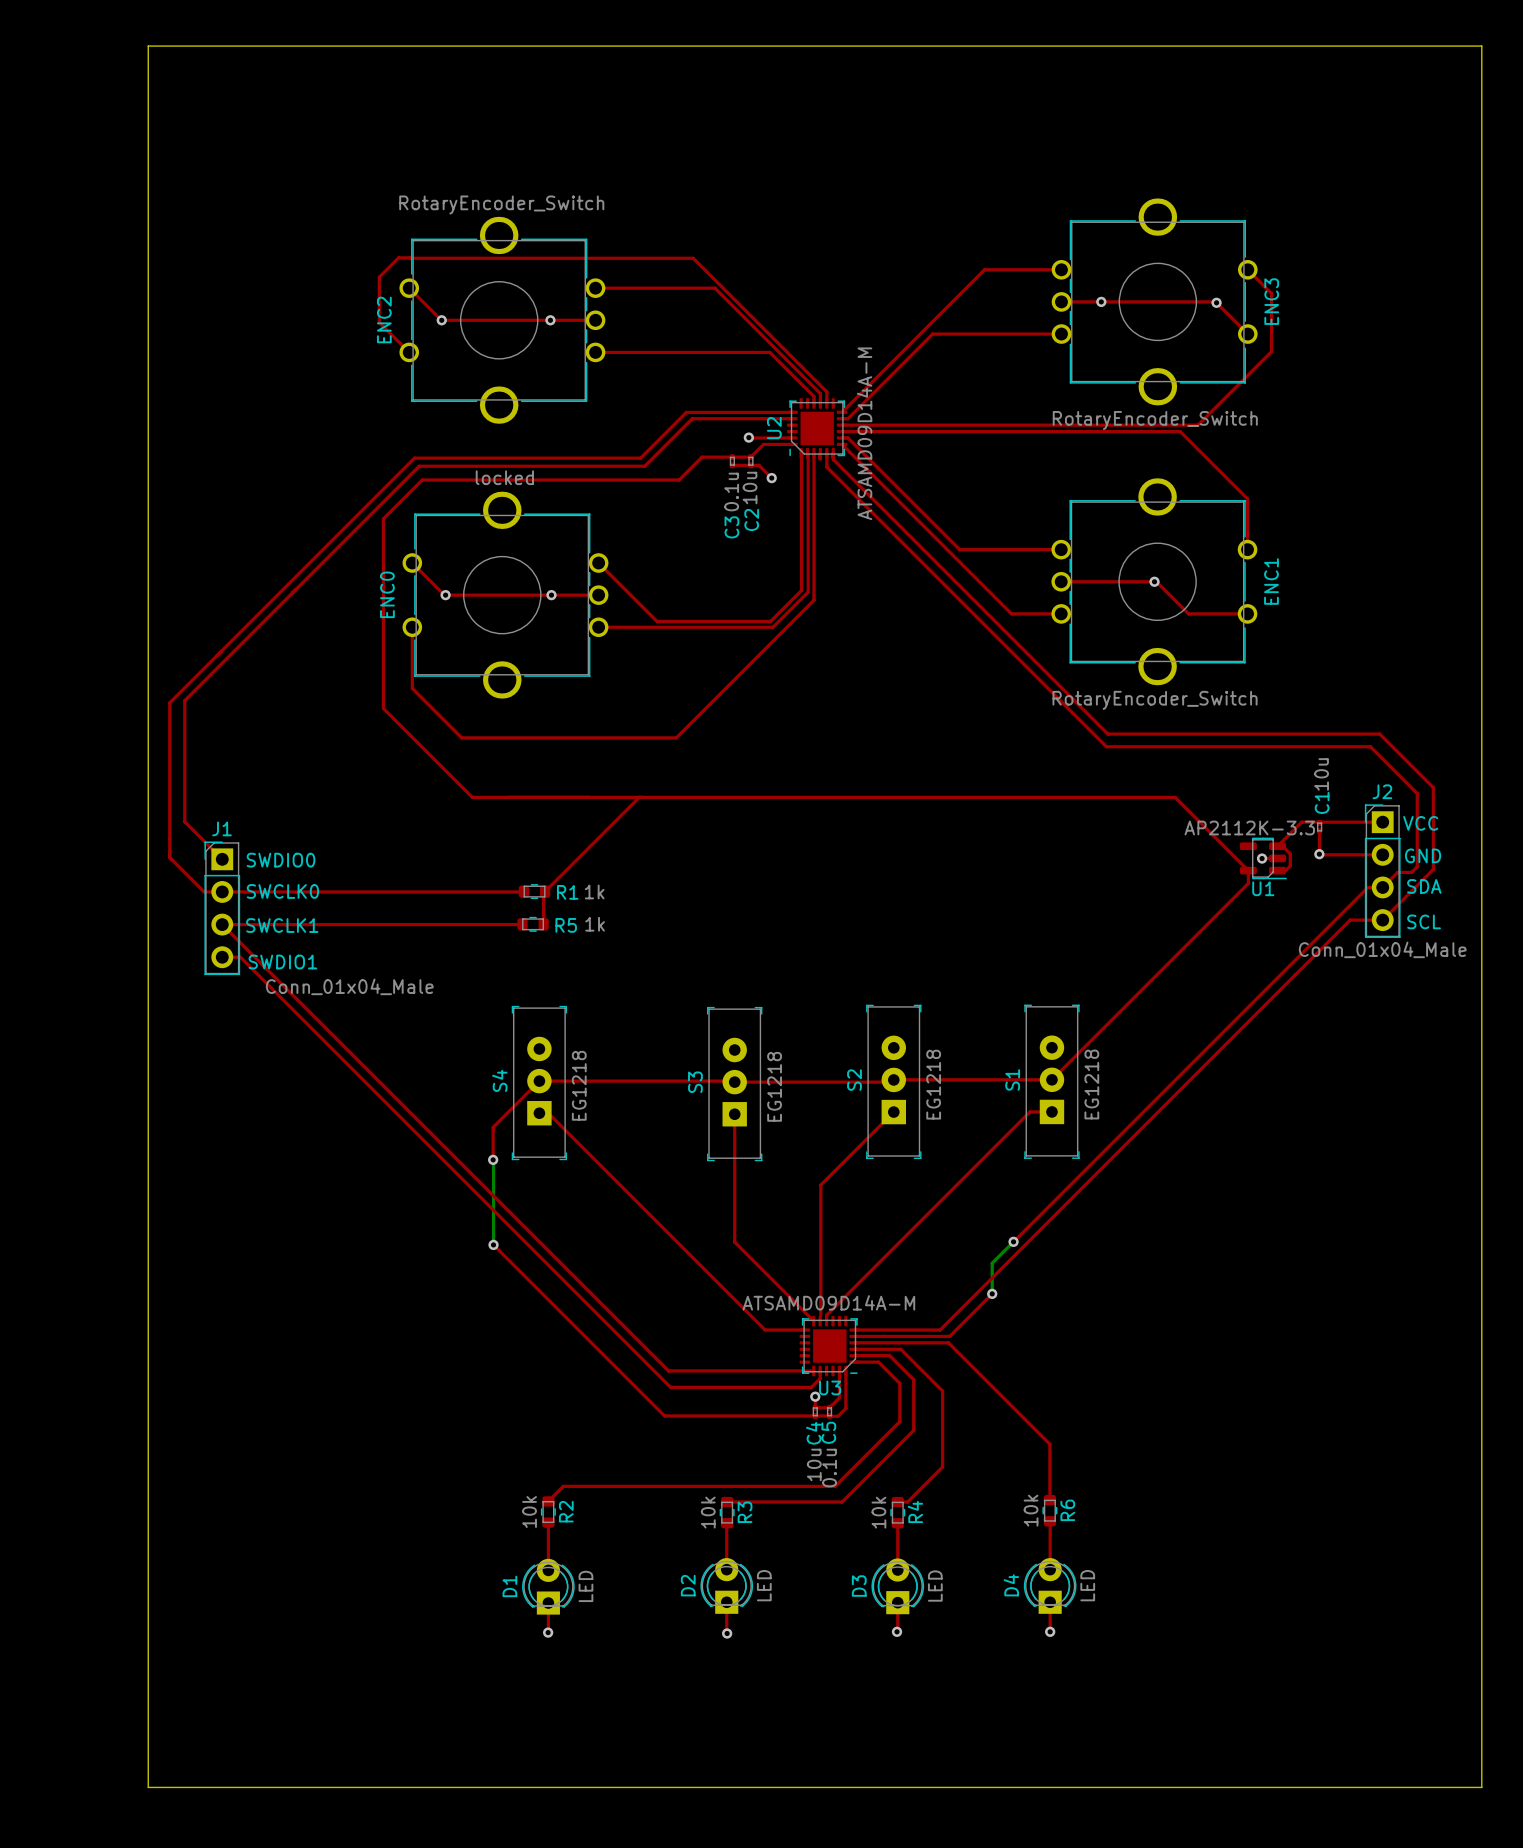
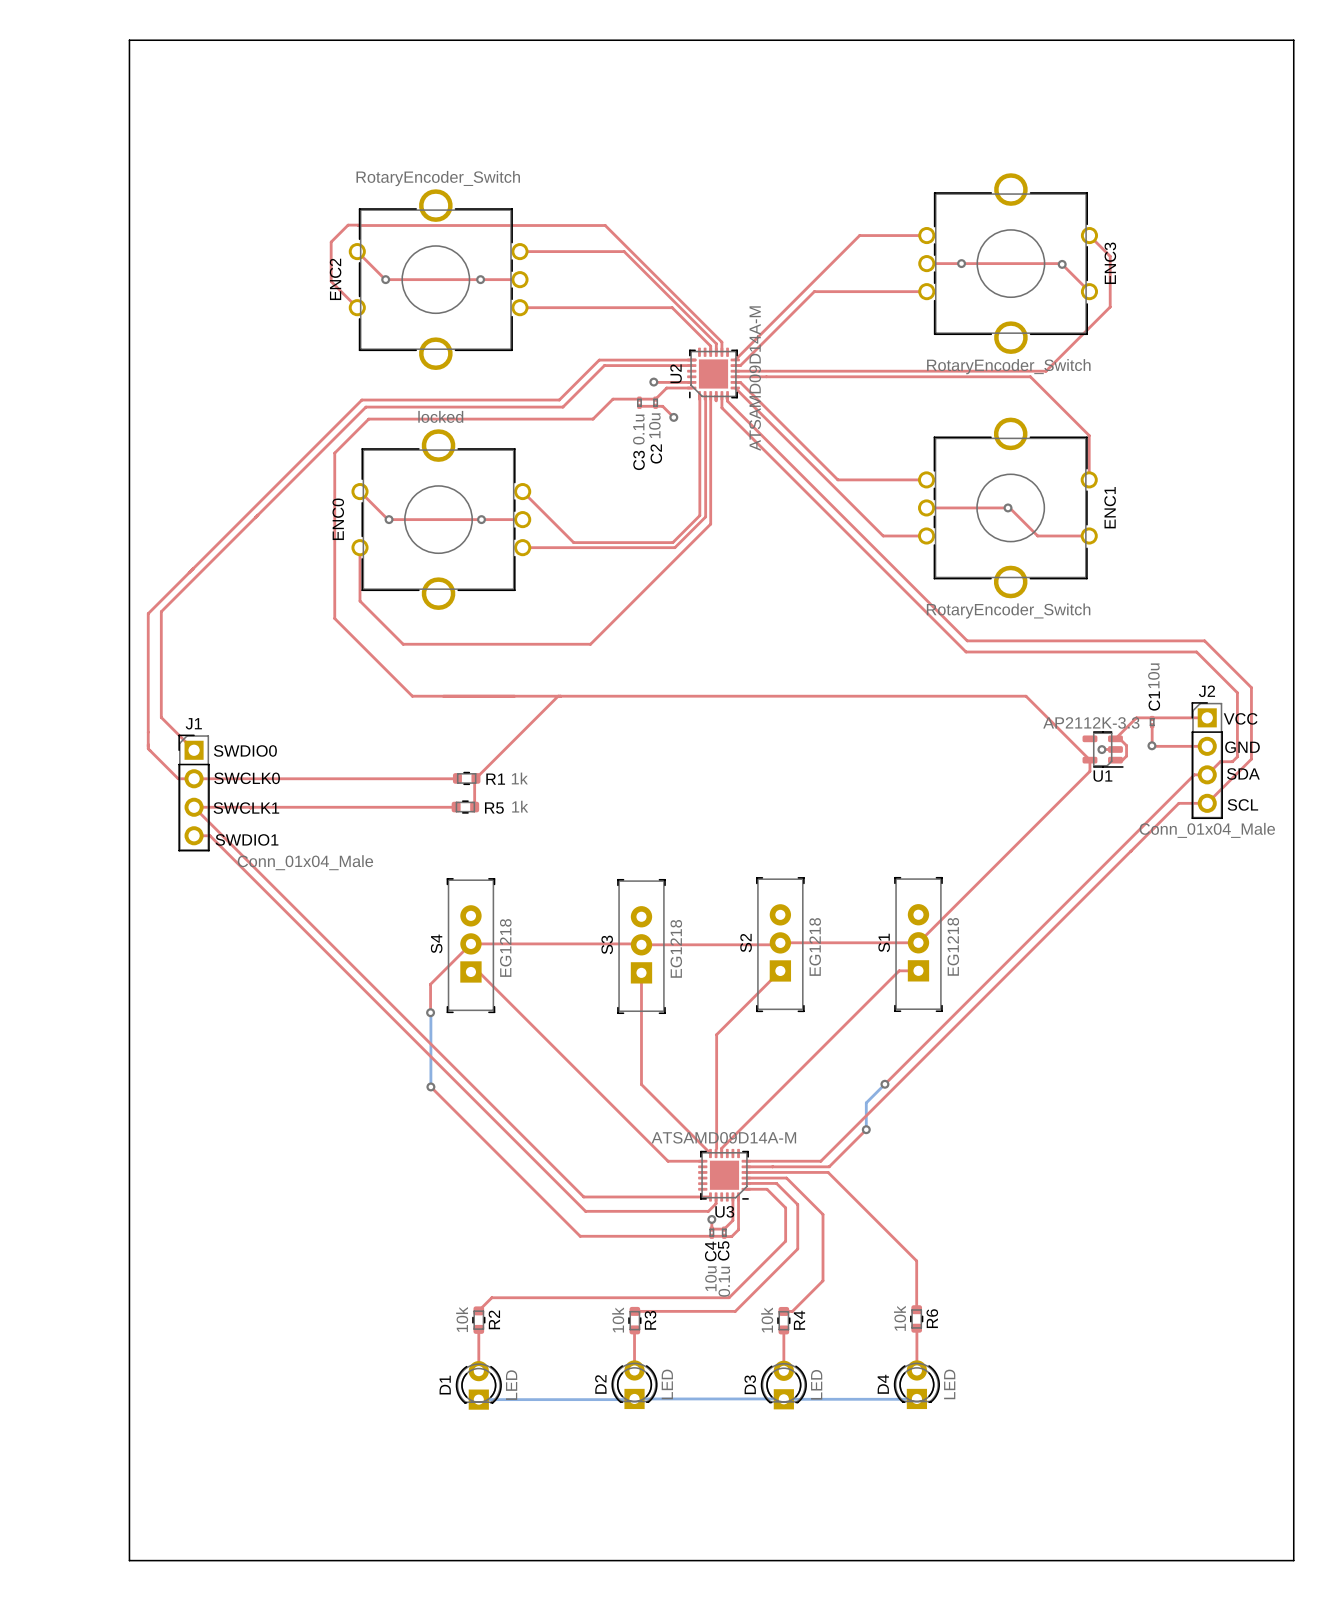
top track: (726, 1602) (727, 1633) -> none
bottom track: none -> (634, 1398) (783, 1398)
top track: (897, 1602) (897, 1631) -> none
bottom track: none -> (783, 1399) (916, 1399)
top track: (1050, 1602) (1050, 1631) -> none
top track: (548, 1603) (548, 1632) -> none
bottom track: none -> (478, 1399) (633, 1399)
via: (897, 1631) -> none
via: (1050, 1631) -> none
via: (548, 1632) -> none
via: (727, 1633) -> none

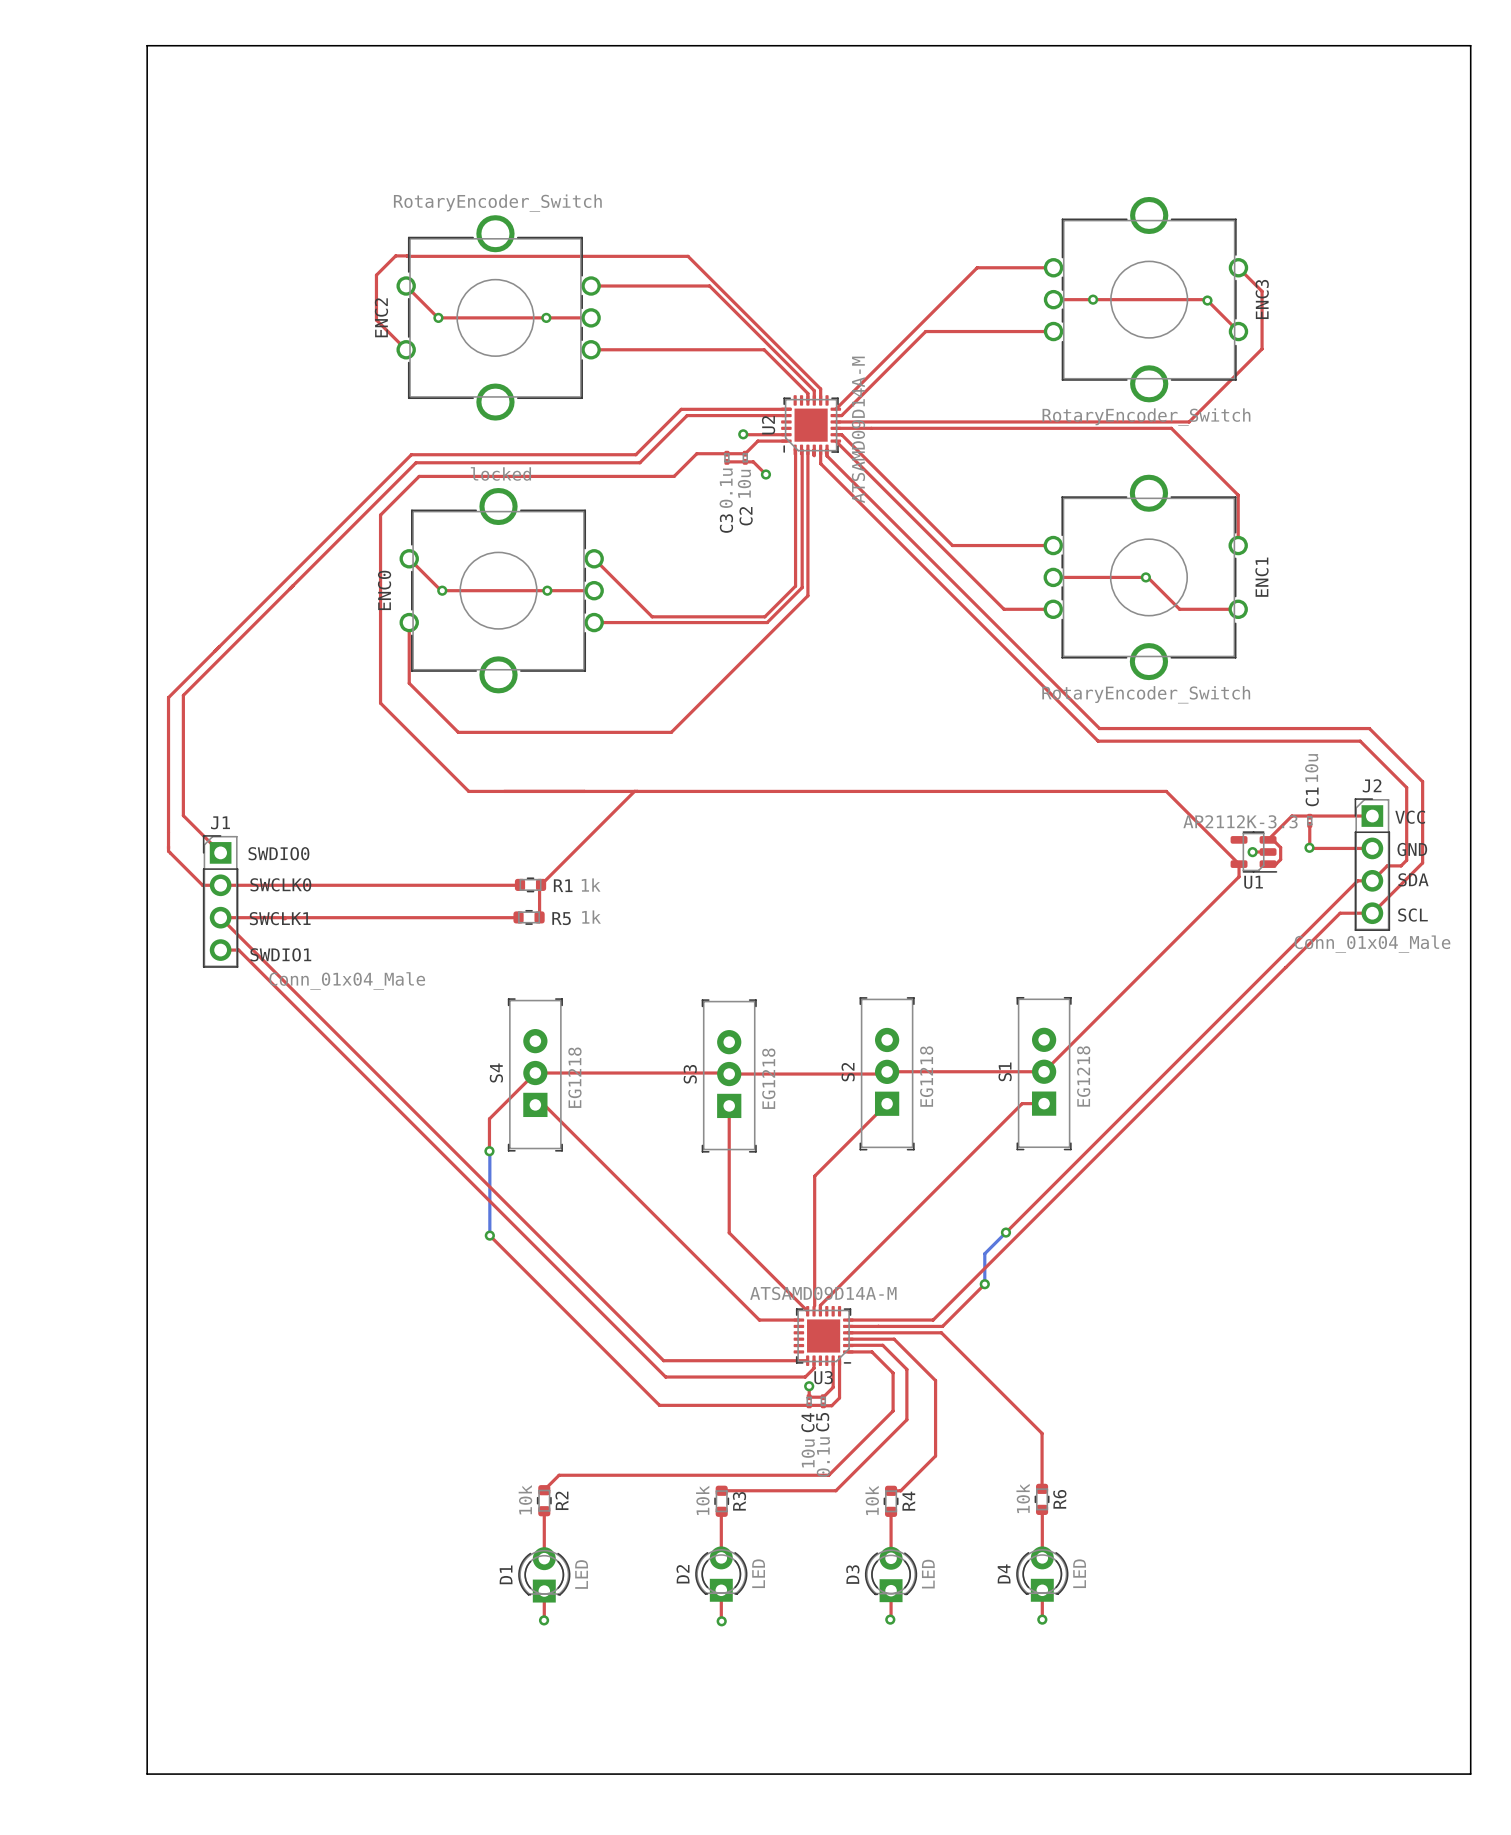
top track: none -> (721, 1590) (721, 1621)
bottom track: (634, 1398) (783, 1398) -> none
top track: none -> (1042, 1590) (1042, 1619)
top track: none -> (544, 1591) (544, 1620)
bottom track: (478, 1399) (633, 1399) -> none
top track: none -> (891, 1590) (890, 1619)
bottom track: (783, 1399) (916, 1399) -> none
via: none -> (890, 1619)
via: none -> (1042, 1619)
via: none -> (544, 1620)
via: none -> (721, 1621)

